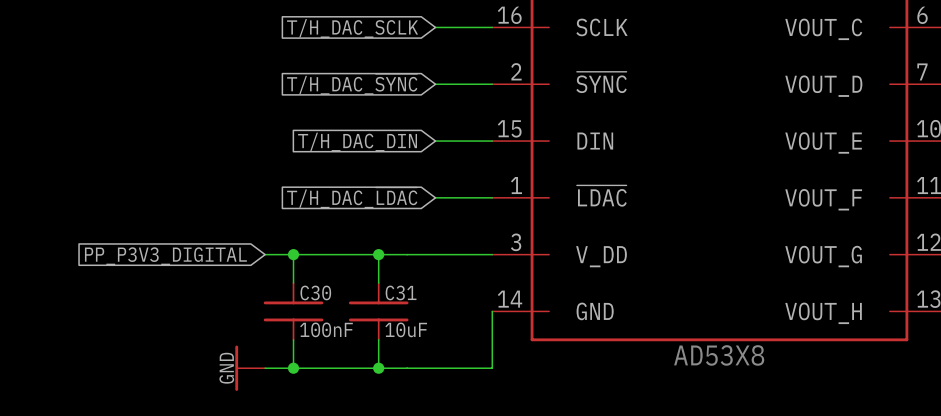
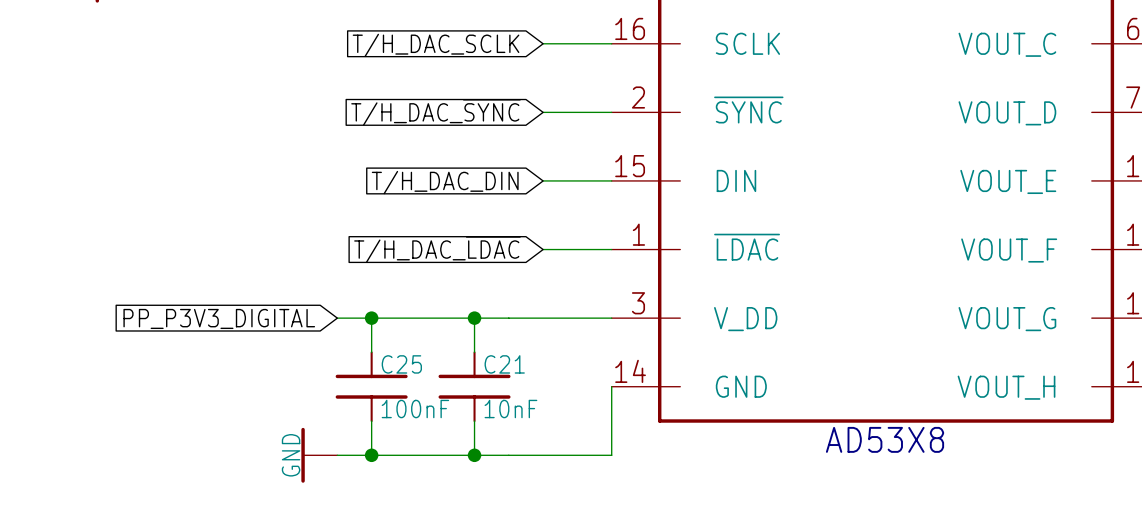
C30 name: C30 (315, 292) -> C25 (401, 364)
C31 name: C31 (401, 292) -> C21 (504, 364)
C31 value: 10uF (406, 329) -> 10nF (510, 409)

